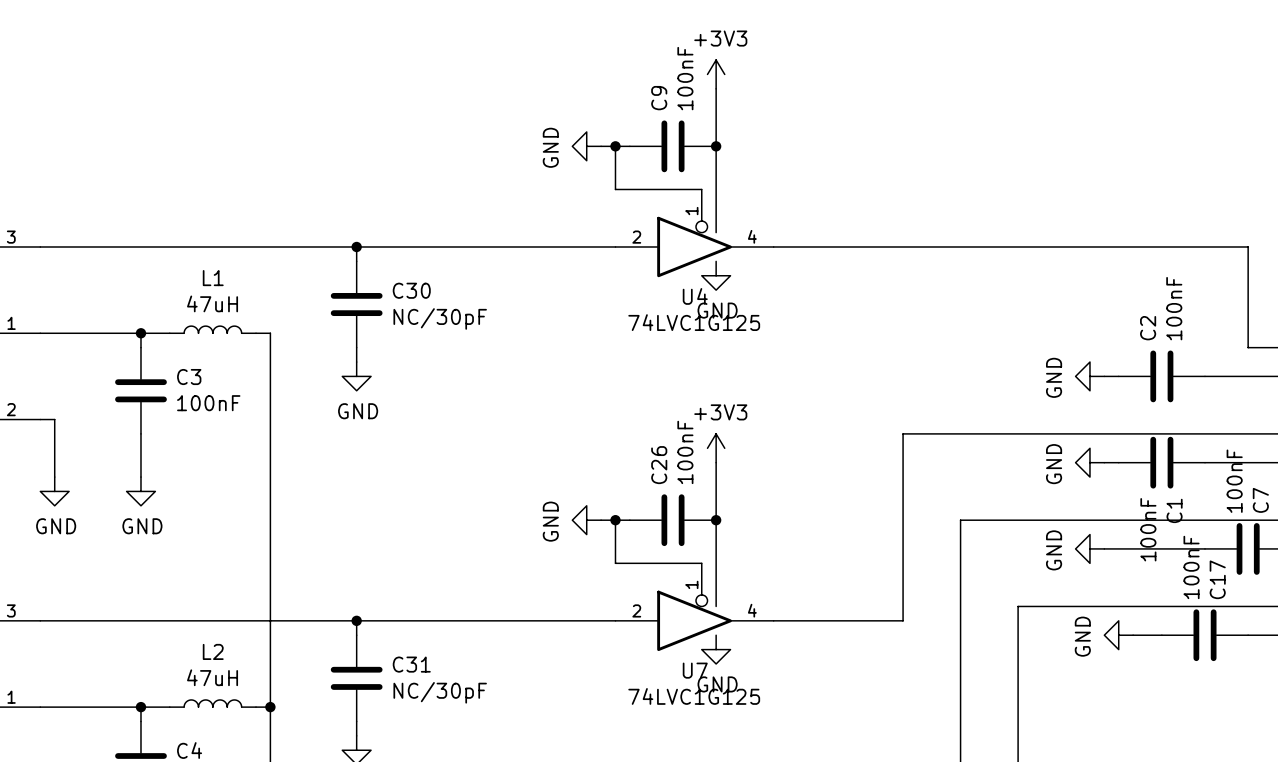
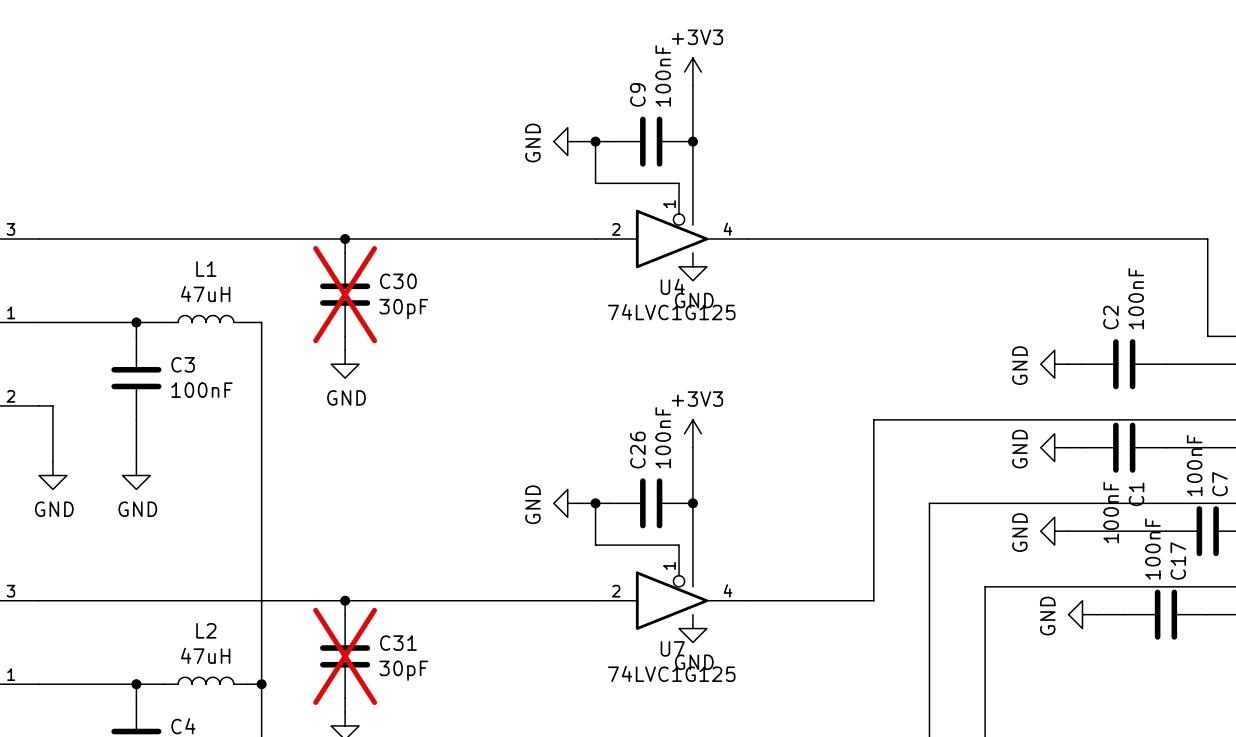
C30 do-not-place cross: none -> (345, 294)
C30 value: NC/30pF (440, 318) -> 30pF (403, 308)
C31 do-not-place cross: none -> (345, 656)
C31 value: NC/30pF (440, 692) -> 30pF (403, 670)

